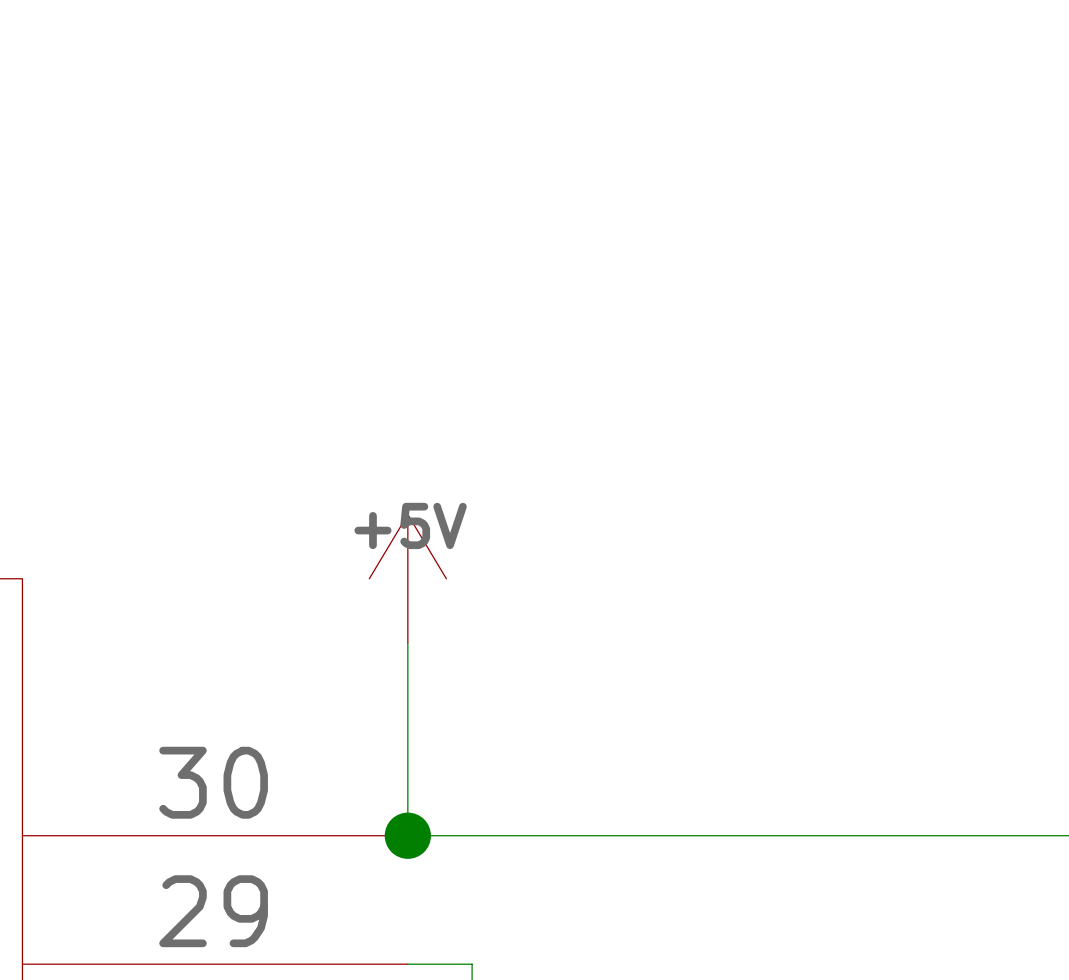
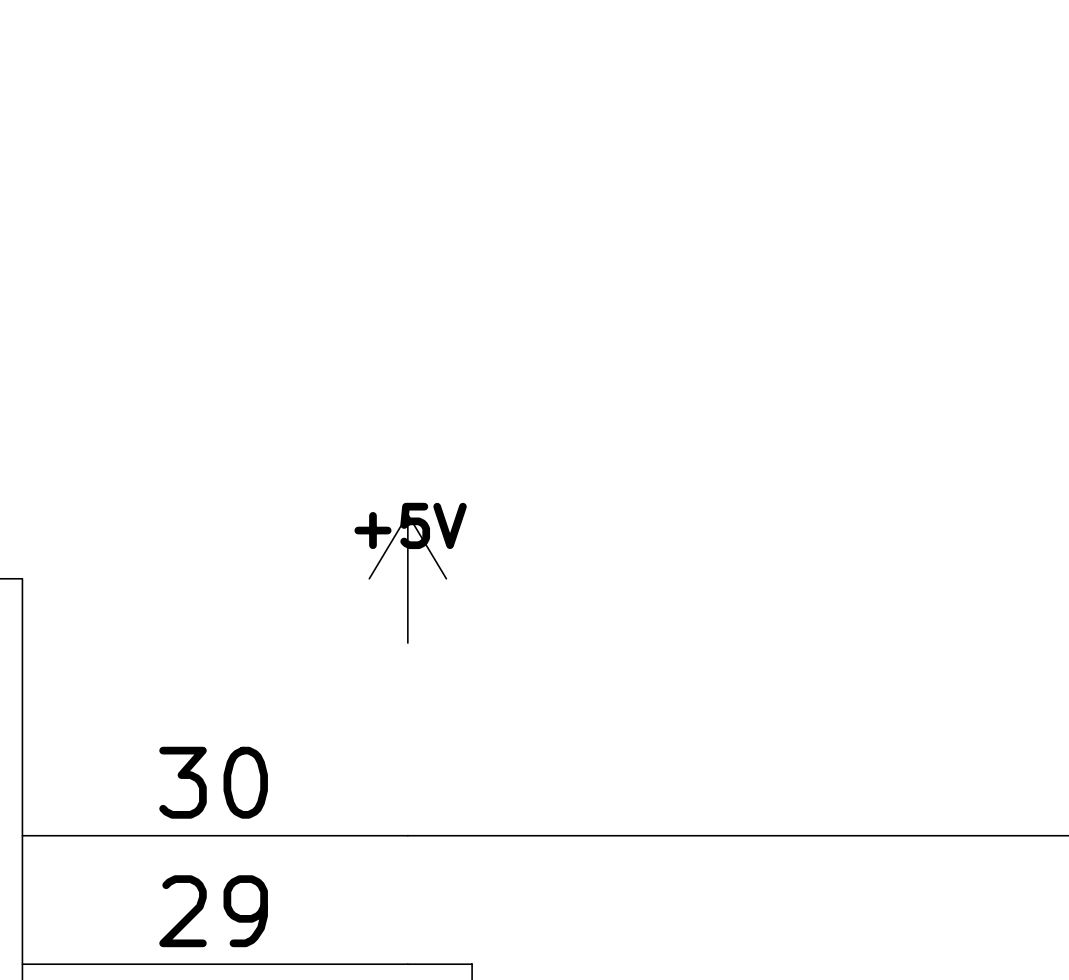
wire: (407, 643) (407, 835) -> none
junction: (407, 835) -> none

